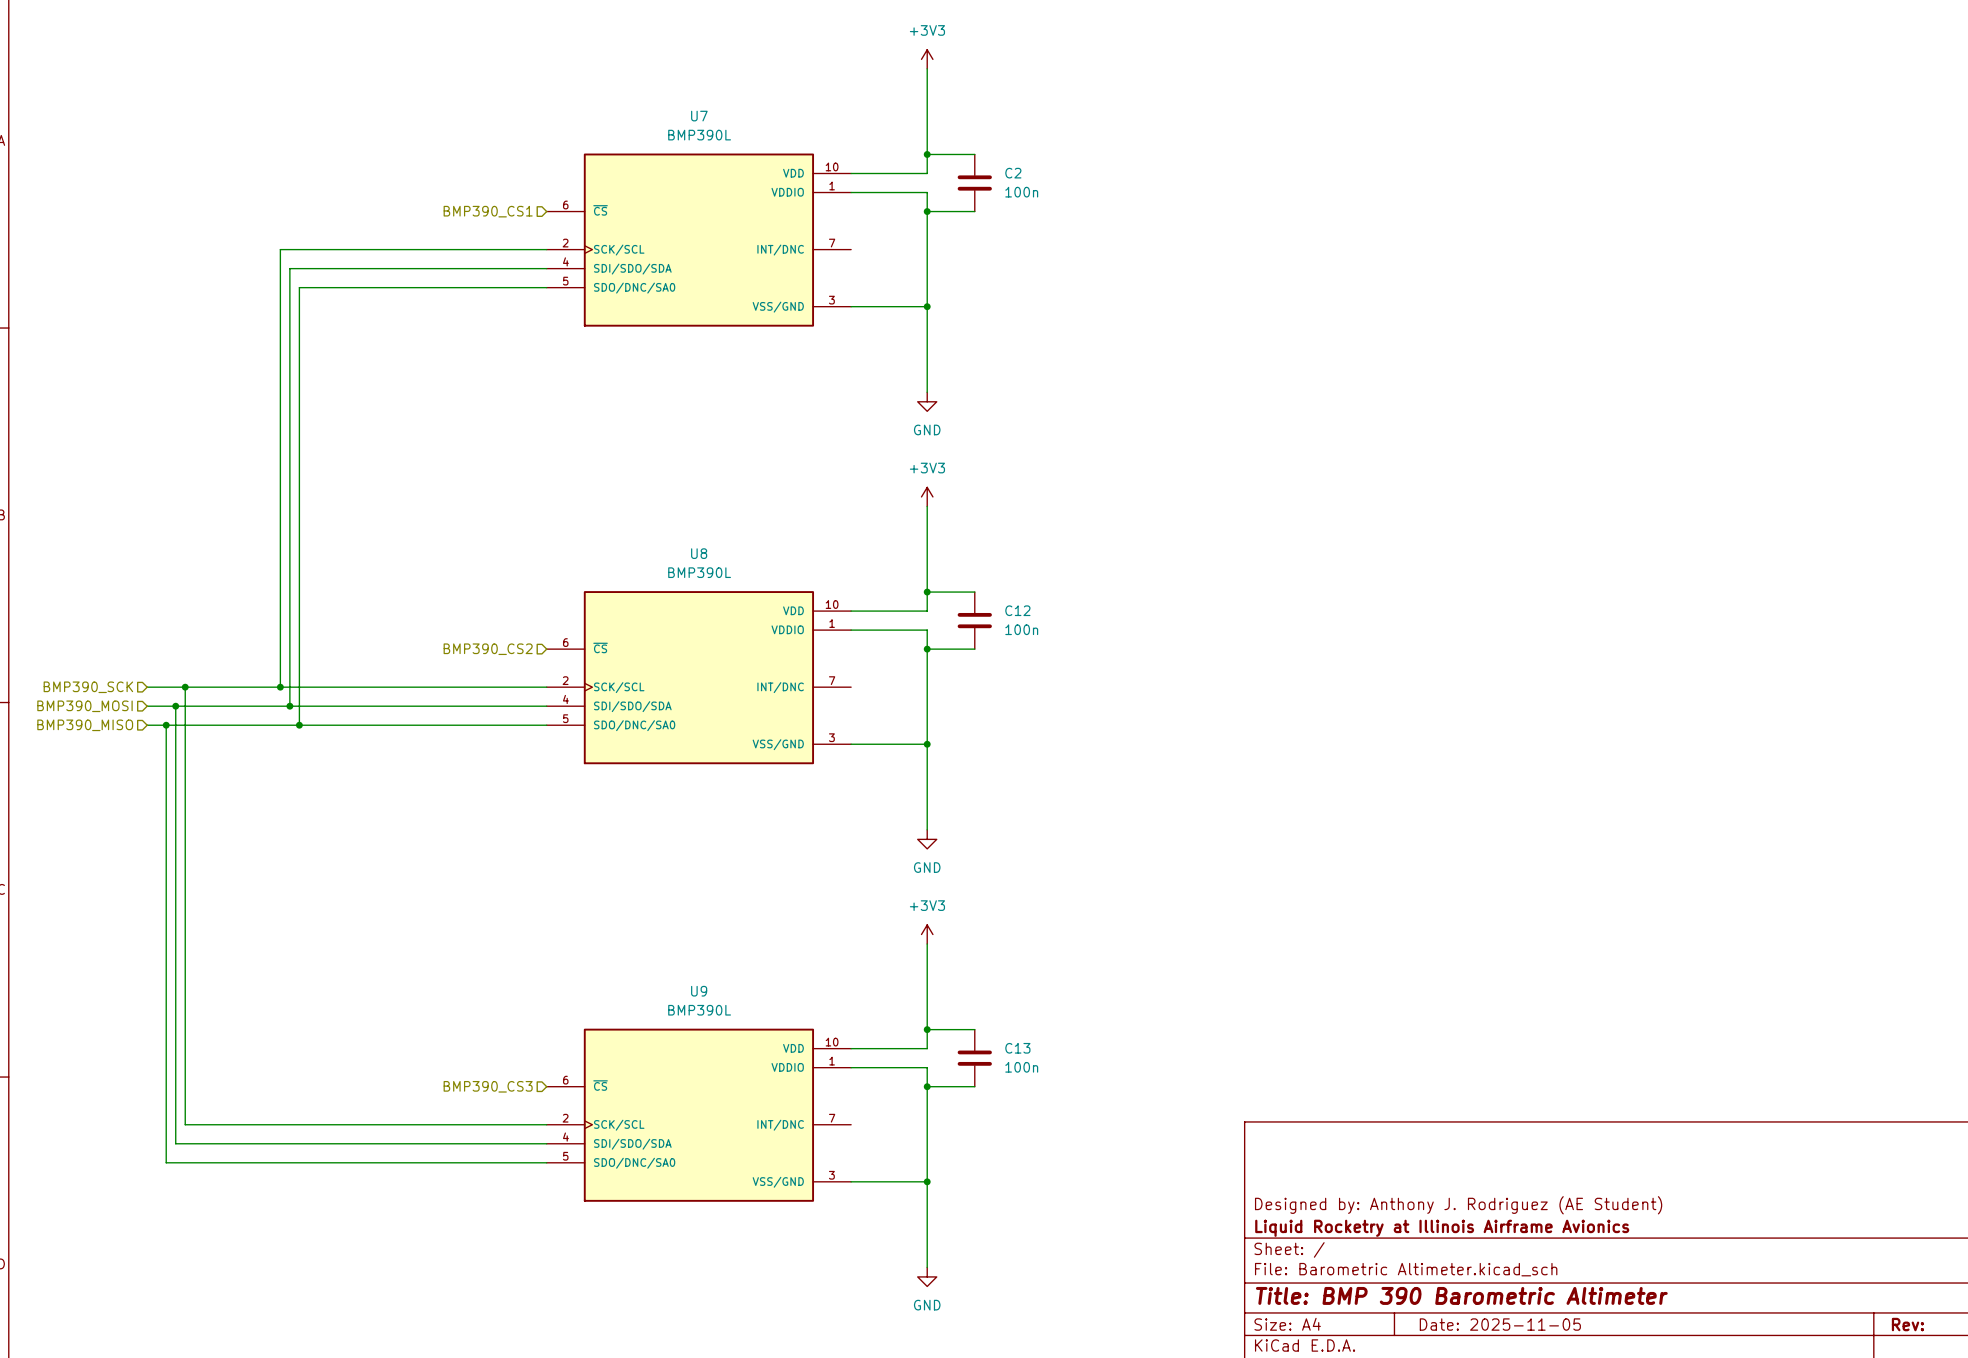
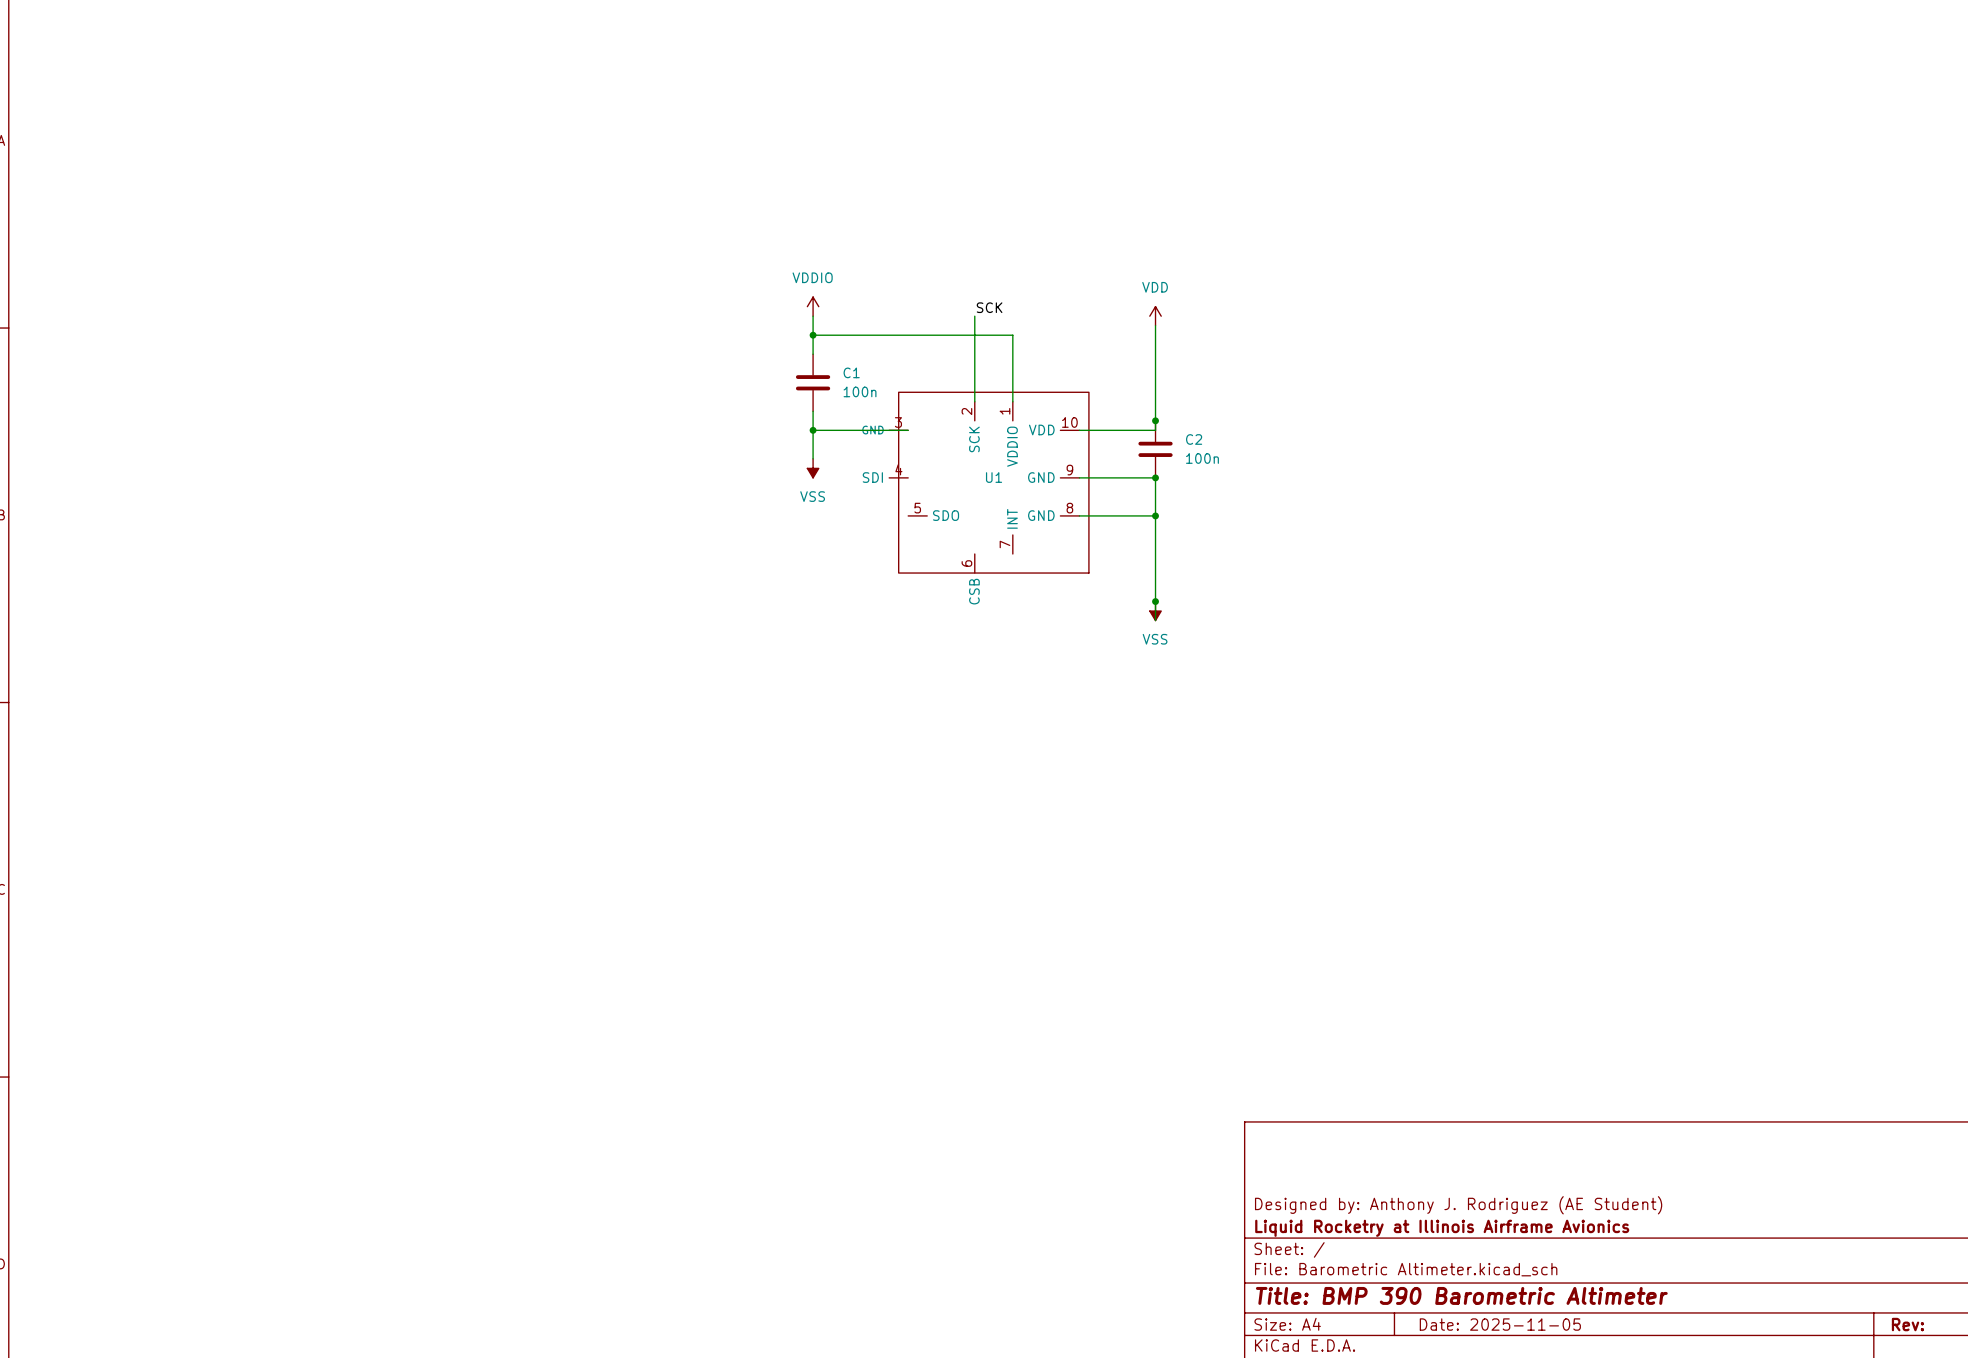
power symbol: +3V3 (927, 59) -> none
wire: (927, 68) (927, 173) (851, 173) -> none
wire: (927, 154) (974, 154) -> none
junction: (927, 154) -> none
C2 position: (974, 183) -> (1155, 449)
wire: (851, 192) (927, 192) (927, 392) -> none
hierarchical label: BMP390_CS1 (488, 211) -> none
wire: (927, 211) (974, 211) -> none
junction: (927, 211) -> none
U7: BMP390L (698, 240) -> none
wire: (546, 249) (280, 249) (280, 687) -> none
wire: (546, 268) (289, 268) (289, 706) -> none
wire: (546, 287) (299, 287) (299, 725) -> none
power symbol: none -> VDDIO (813, 306)
wire: (851, 306) (927, 306) -> none
junction: (927, 306) -> none
label: none -> SCK (989, 307)
wire: none -> (813, 316) (813, 354)
wire: none -> (974, 316) (974, 401)
power symbol: none -> VDD (1155, 316)
wire: none -> (1155, 325) (1155, 430) (1079, 430)
wire: none -> (813, 335) (1012, 335) (1012, 401)
junction: none -> (813, 335)
C1: none -> 100n (813, 382)
power symbol: GND (927, 401) -> none
wire: none -> (813, 411) (813, 458)
junction: none -> (1155, 420)
wire: none -> (813, 430) (908, 430)
junction: none -> (813, 430)
power symbol: none -> VSS (813, 468)
wire: none -> (1079, 477) (1155, 477) (1155, 620)
junction: none -> (1155, 477)
U1: none -> (989, 482)
power symbol: +3V3 (927, 496) -> none
wire: (927, 506) (927, 611) (851, 611) -> none
wire: none -> (1079, 515) (1155, 515)
junction: none -> (1155, 515)
wire: (927, 592) (974, 592) -> none
junction: (927, 592) -> none
junction: none -> (1155, 601)
power symbol: none -> VSS (1155, 611)
C12: 100n (974, 620) -> none
wire: (851, 630) (927, 630) (927, 829) -> none
hierarchical label: BMP390_CS2 (488, 649) -> none
wire: (927, 649) (974, 649) -> none
junction: (927, 649) -> none
U8: BMP390L (698, 677) -> none
hierarchical label: BMP390_SCK (88, 687) -> none
wire: (147, 687) (546, 687) -> none
wire: (185, 687) (185, 1124) (546, 1124) -> none
junction: (185, 687) -> none
junction: (280, 687) -> none
hierarchical label: BMP390_MOSI (84, 706) -> none
wire: (147, 706) (546, 706) -> none
wire: (175, 706) (175, 1143) (546, 1143) -> none
junction: (175, 706) -> none
junction: (289, 706) -> none
hierarchical label: BMP390_MISO (85, 725) -> none
wire: (147, 725) (546, 725) -> none
wire: (166, 725) (166, 1162) (546, 1162) -> none
junction: (166, 725) -> none
junction: (299, 725) -> none
wire: (851, 744) (927, 744) -> none
junction: (927, 744) -> none
power symbol: GND (927, 839) -> none
power symbol: +3V3 (927, 934) -> none
wire: (927, 944) (927, 1048) (851, 1048) -> none
wire: (927, 1029) (974, 1029) -> none
junction: (927, 1029) -> none
C13: 100n (974, 1058) -> none
wire: (851, 1067) (927, 1067) (927, 1267) -> none
hierarchical label: BMP390_CS3 (488, 1086) -> none
wire: (927, 1086) (974, 1086) -> none
junction: (927, 1086) -> none
U9: BMP390L (698, 1115) -> none
wire: (851, 1181) (927, 1181) -> none
junction: (927, 1181) -> none
power symbol: GND (927, 1276) -> none

